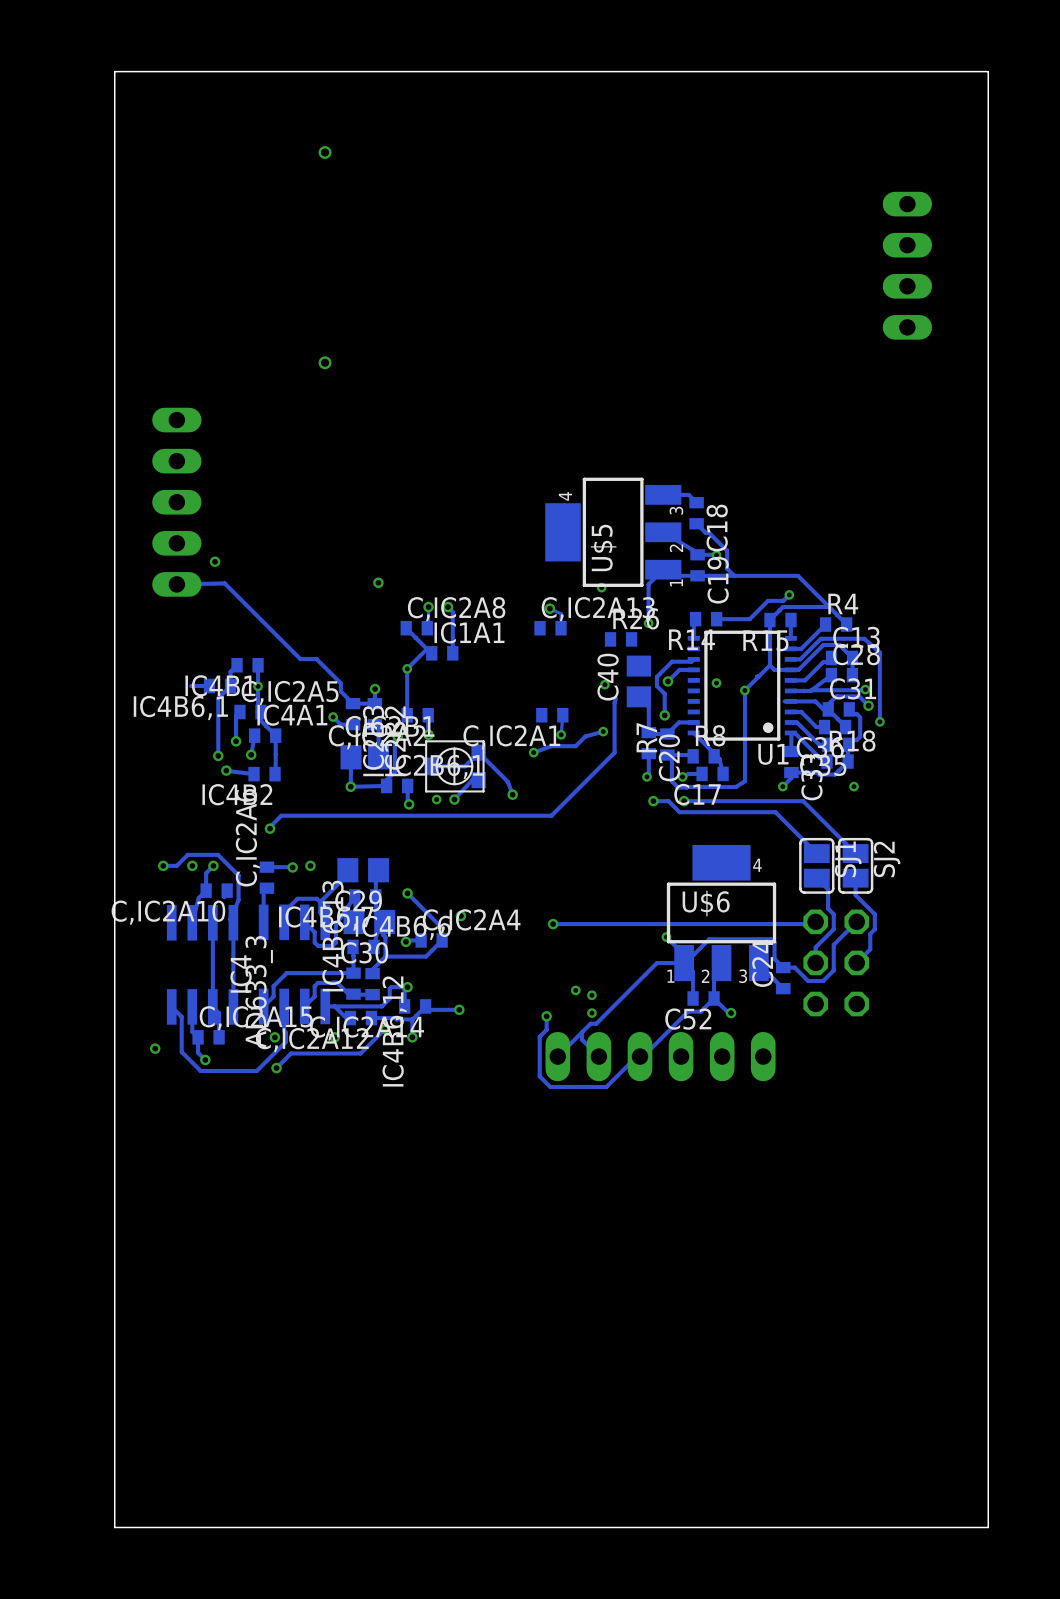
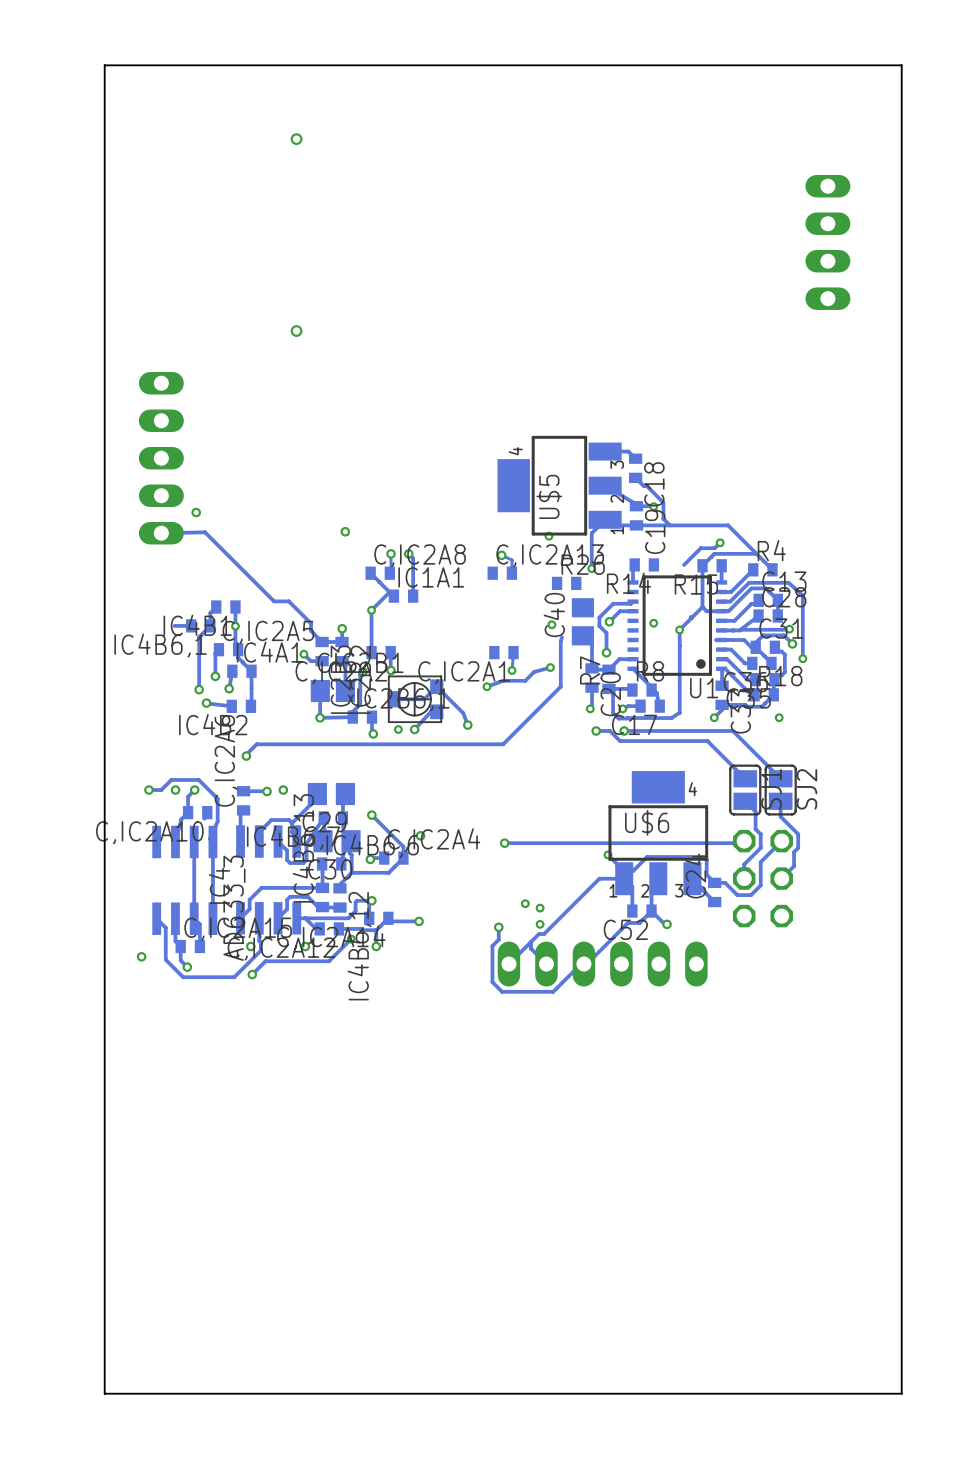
track: (749, 619) (716, 619) -> none

